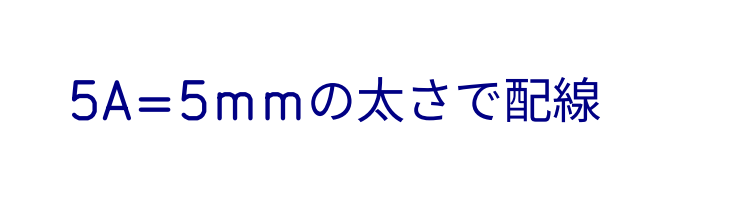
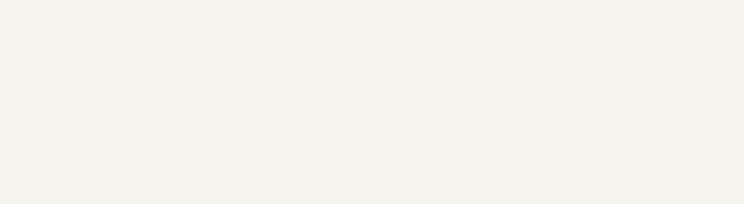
text: 5A=5mmの太さで配線 (337, 99) -> none

